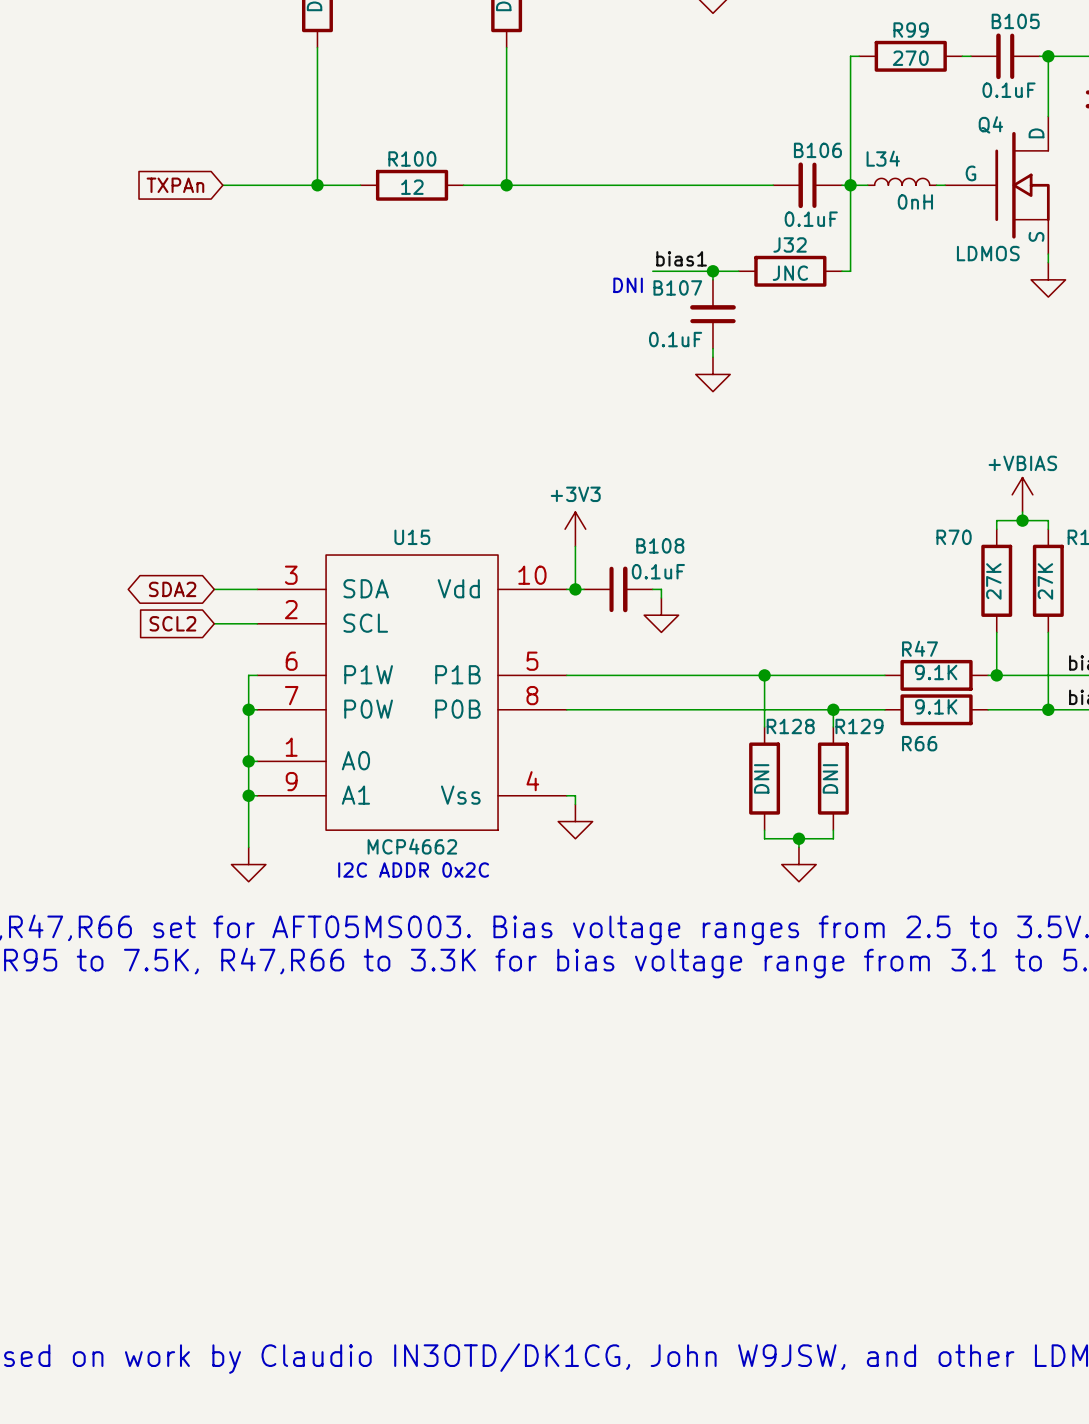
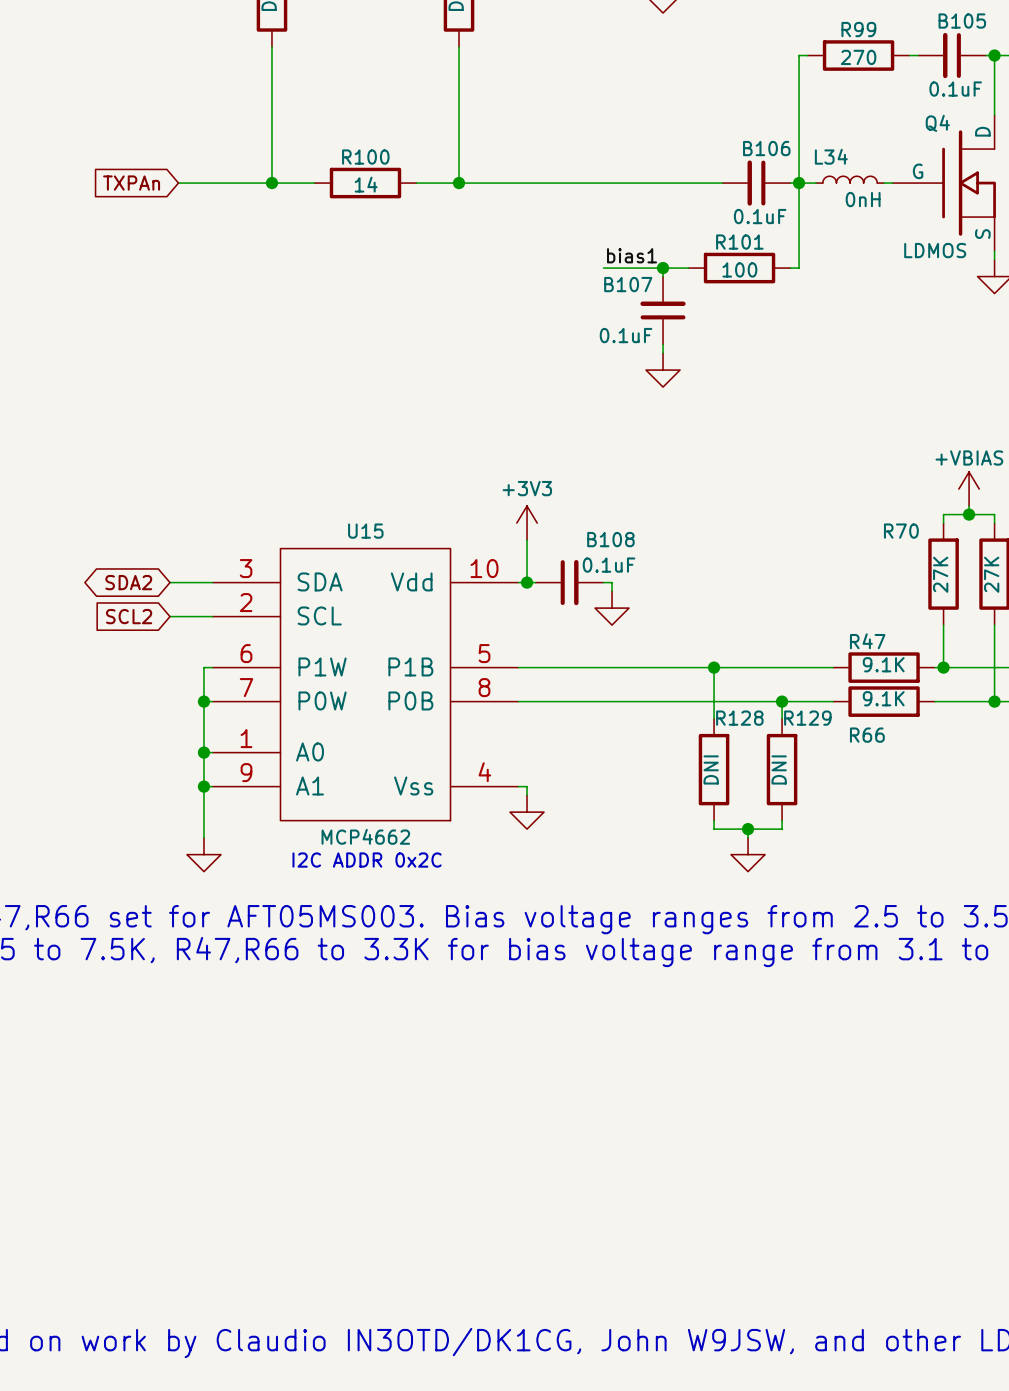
R100 value: 12 (412, 187) -> 14 (366, 184)
J32 name: J32 (790, 244) -> R101 (739, 242)
J32 value: JNC (790, 273) -> 100 (739, 269)
text: DNI (628, 285) -> none

